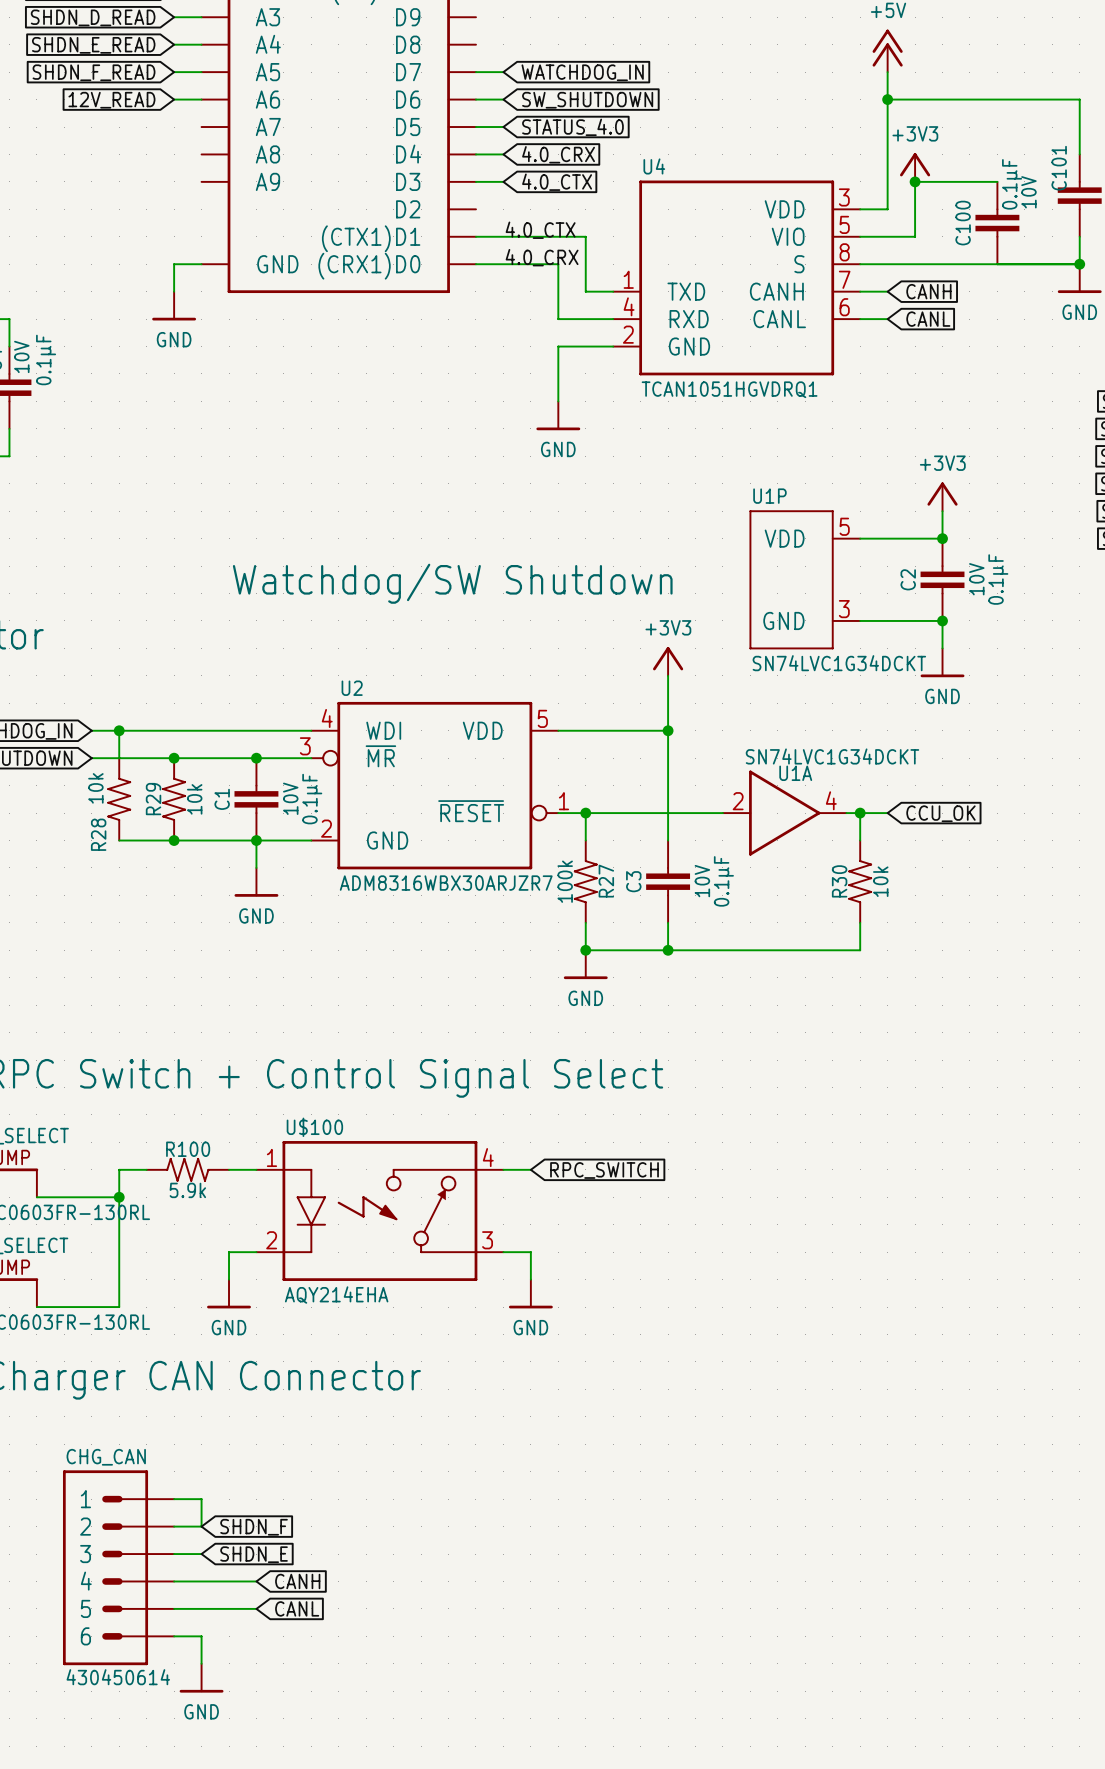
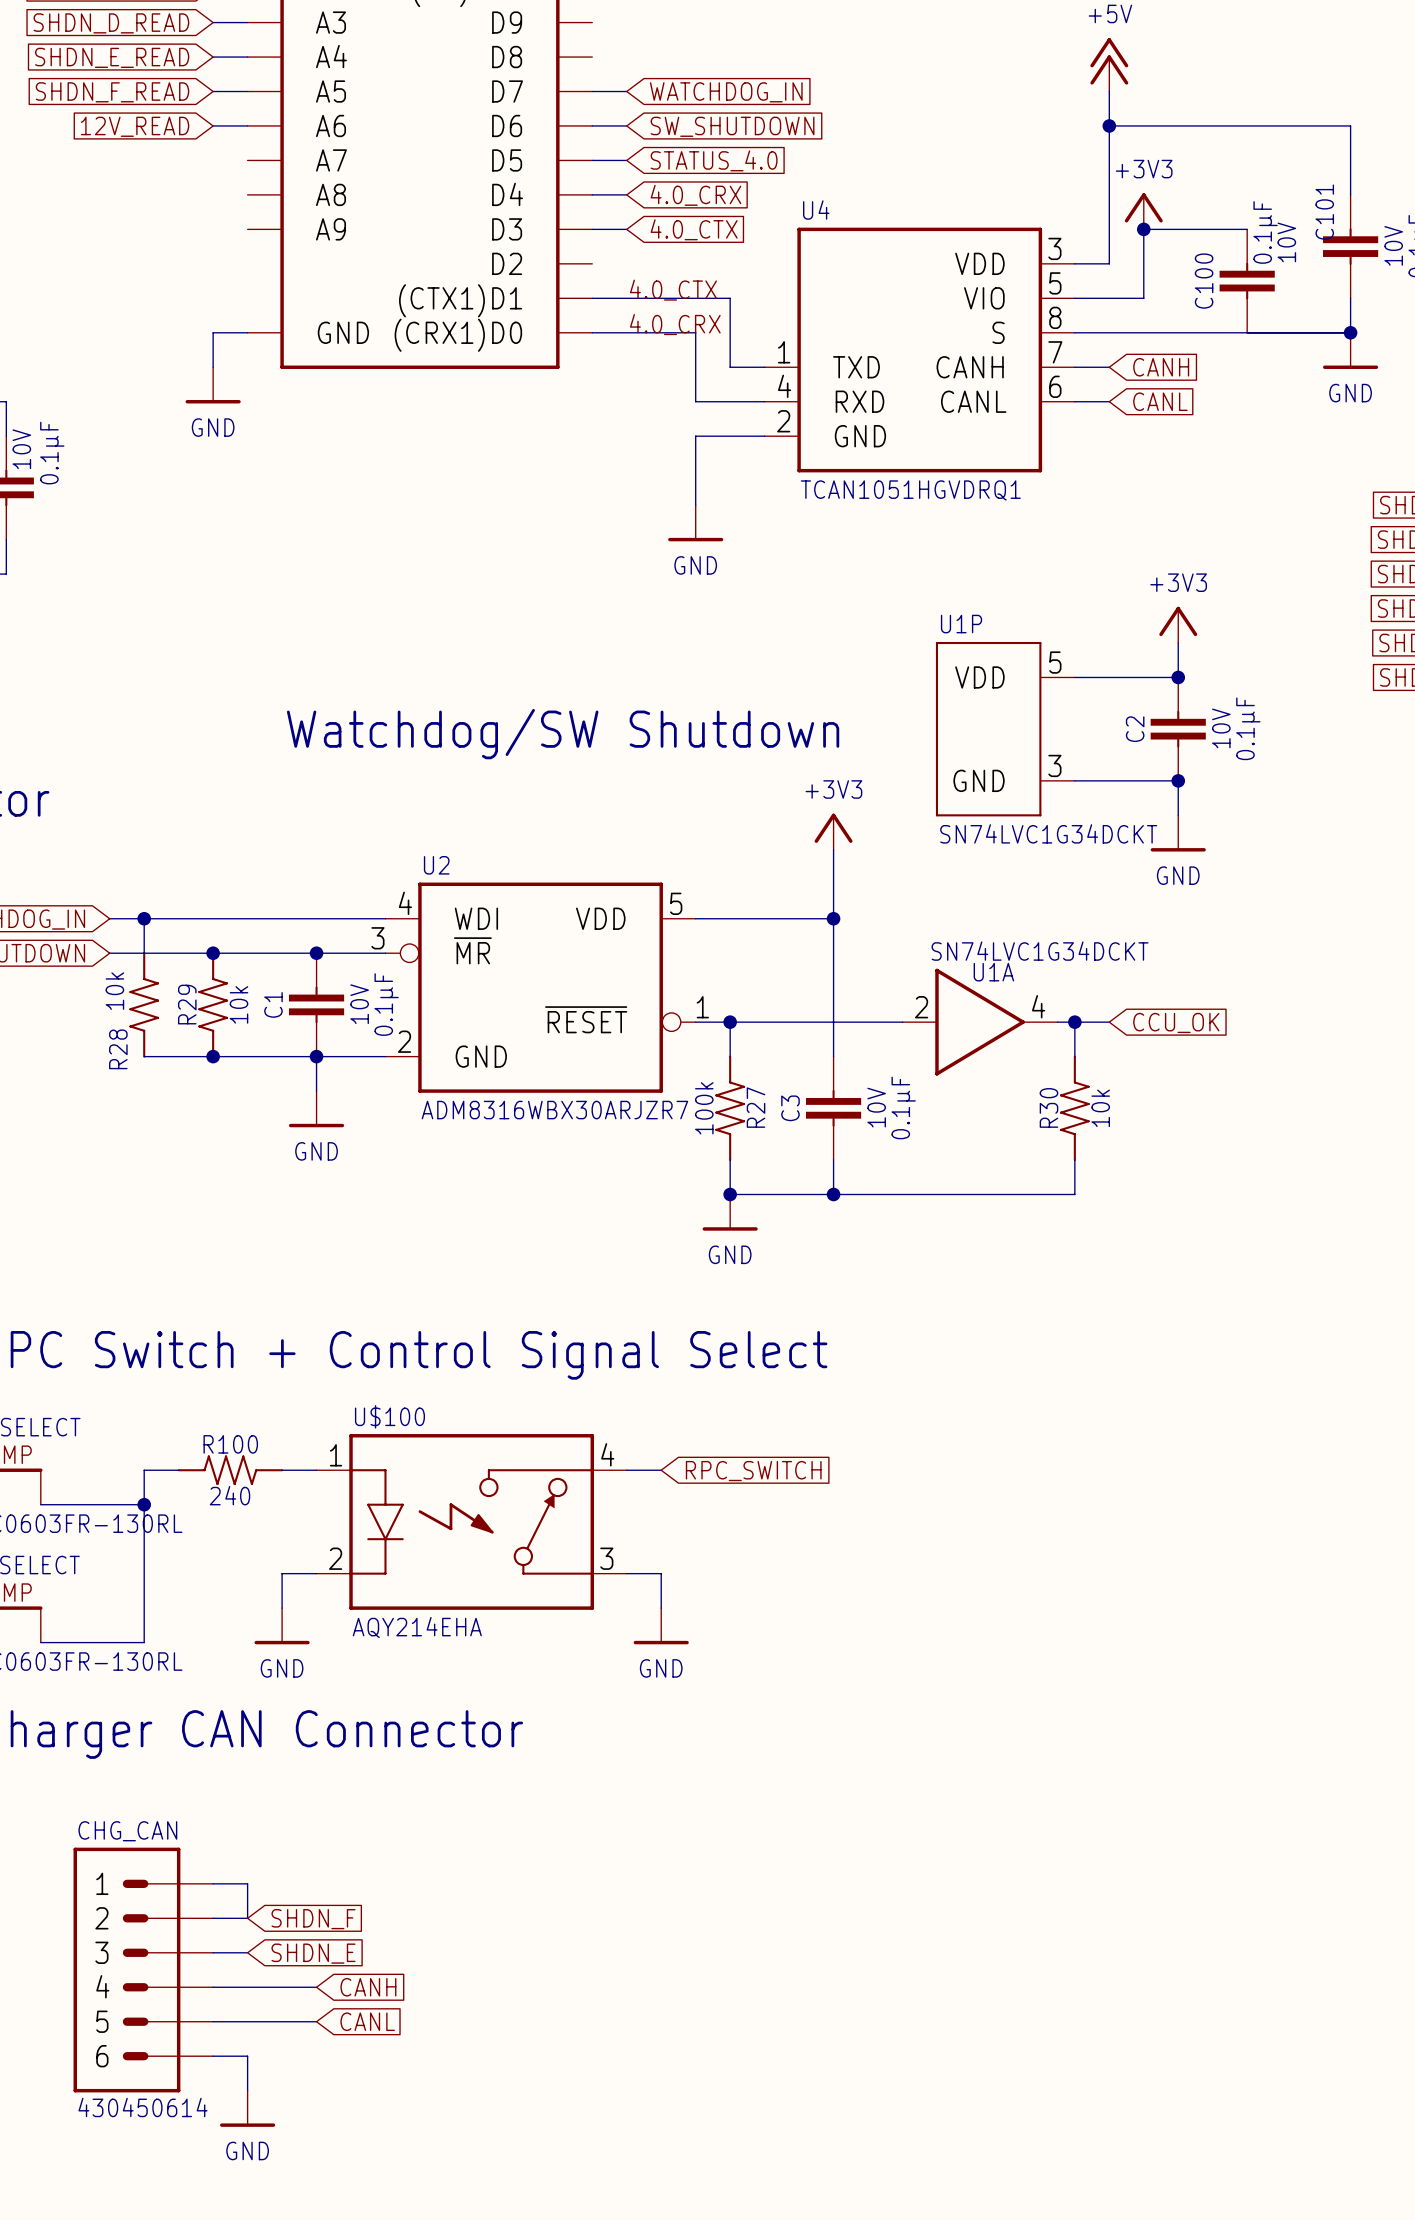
R100 text: 5.9k (187, 1190) -> 240 (230, 1495)

